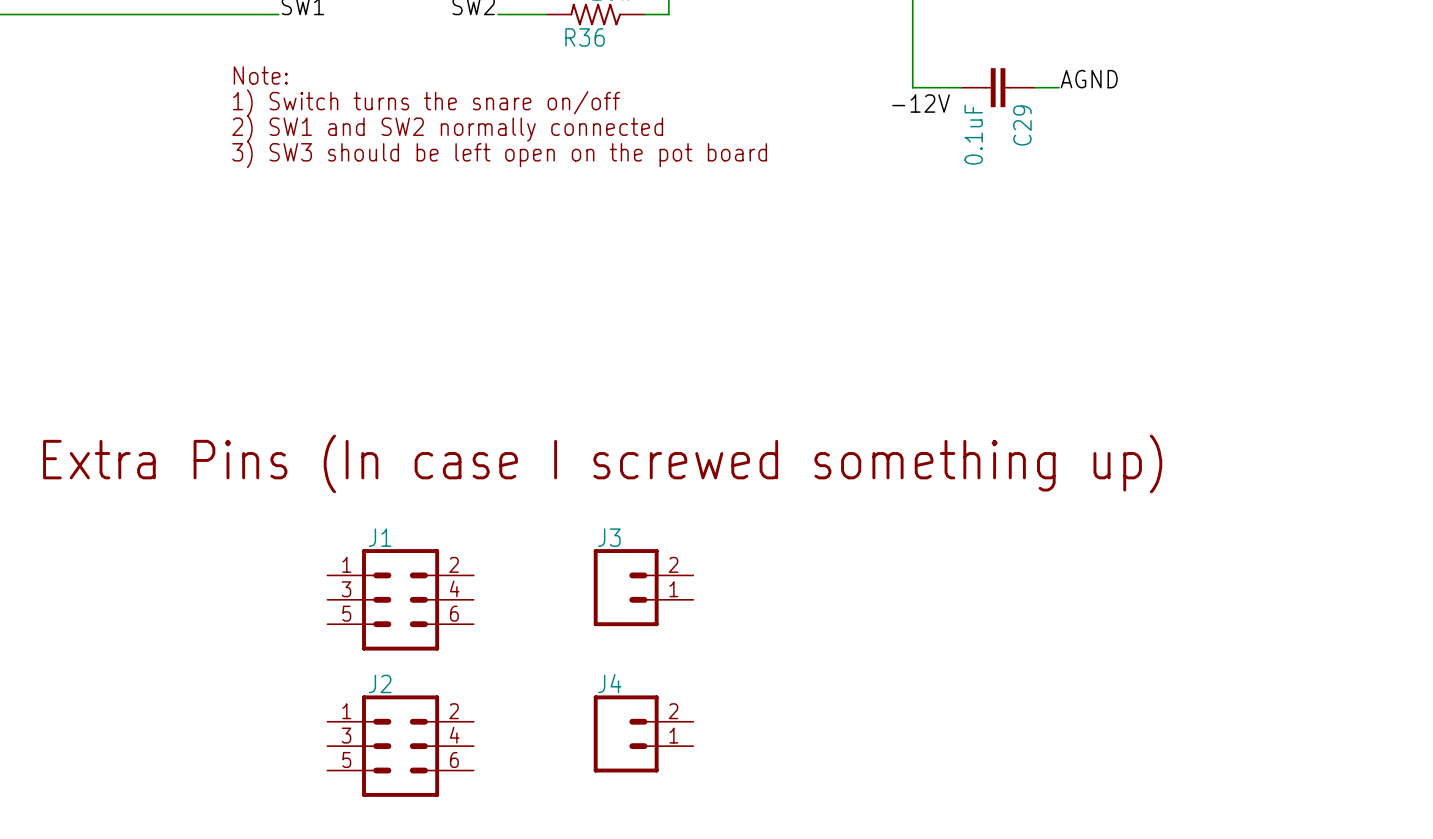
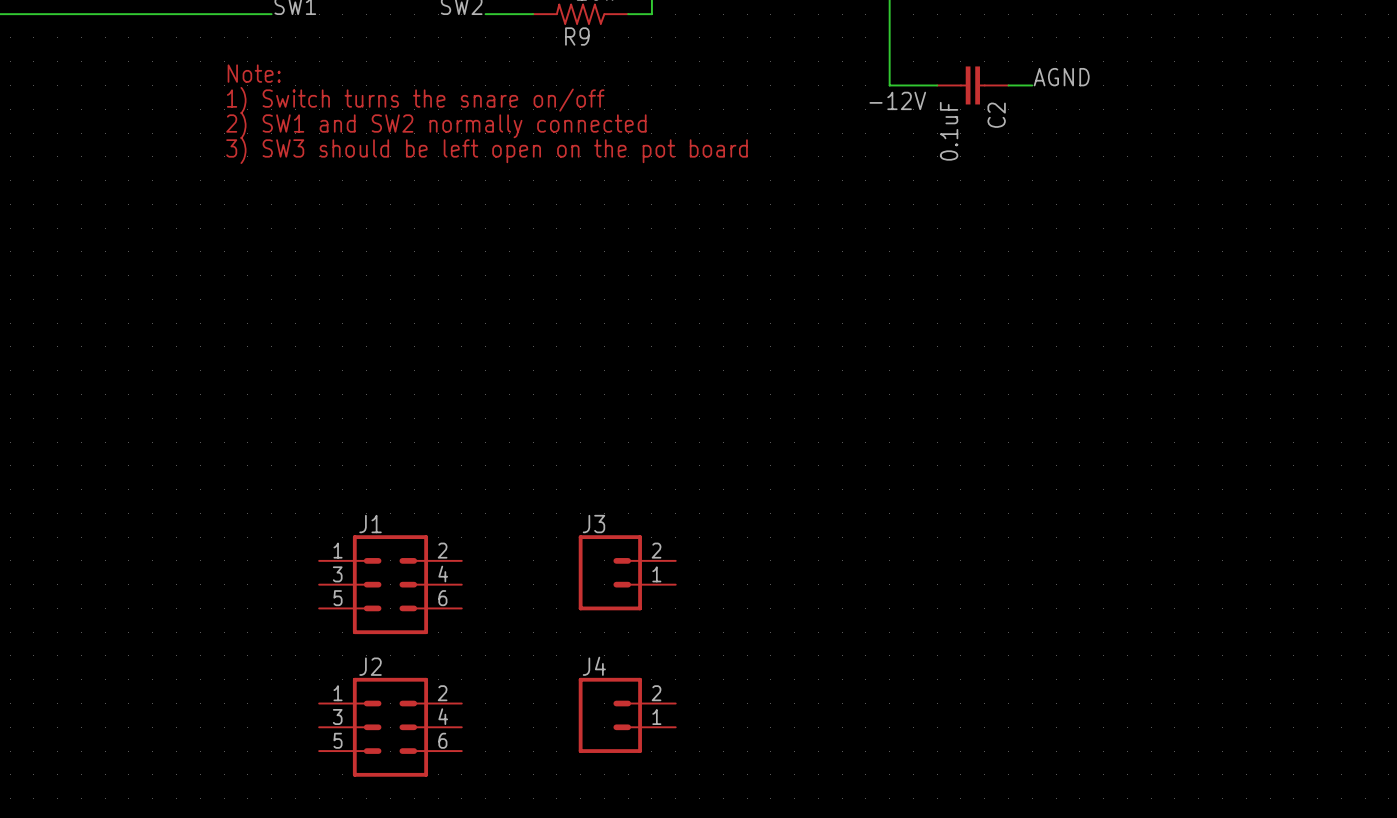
R36 name: R36 (585, 37) -> R9 (577, 36)
C29 name: C29 (1022, 125) -> C2 (996, 115)
text: Extra Pins (In case I screwed something up) (602, 463) -> none

